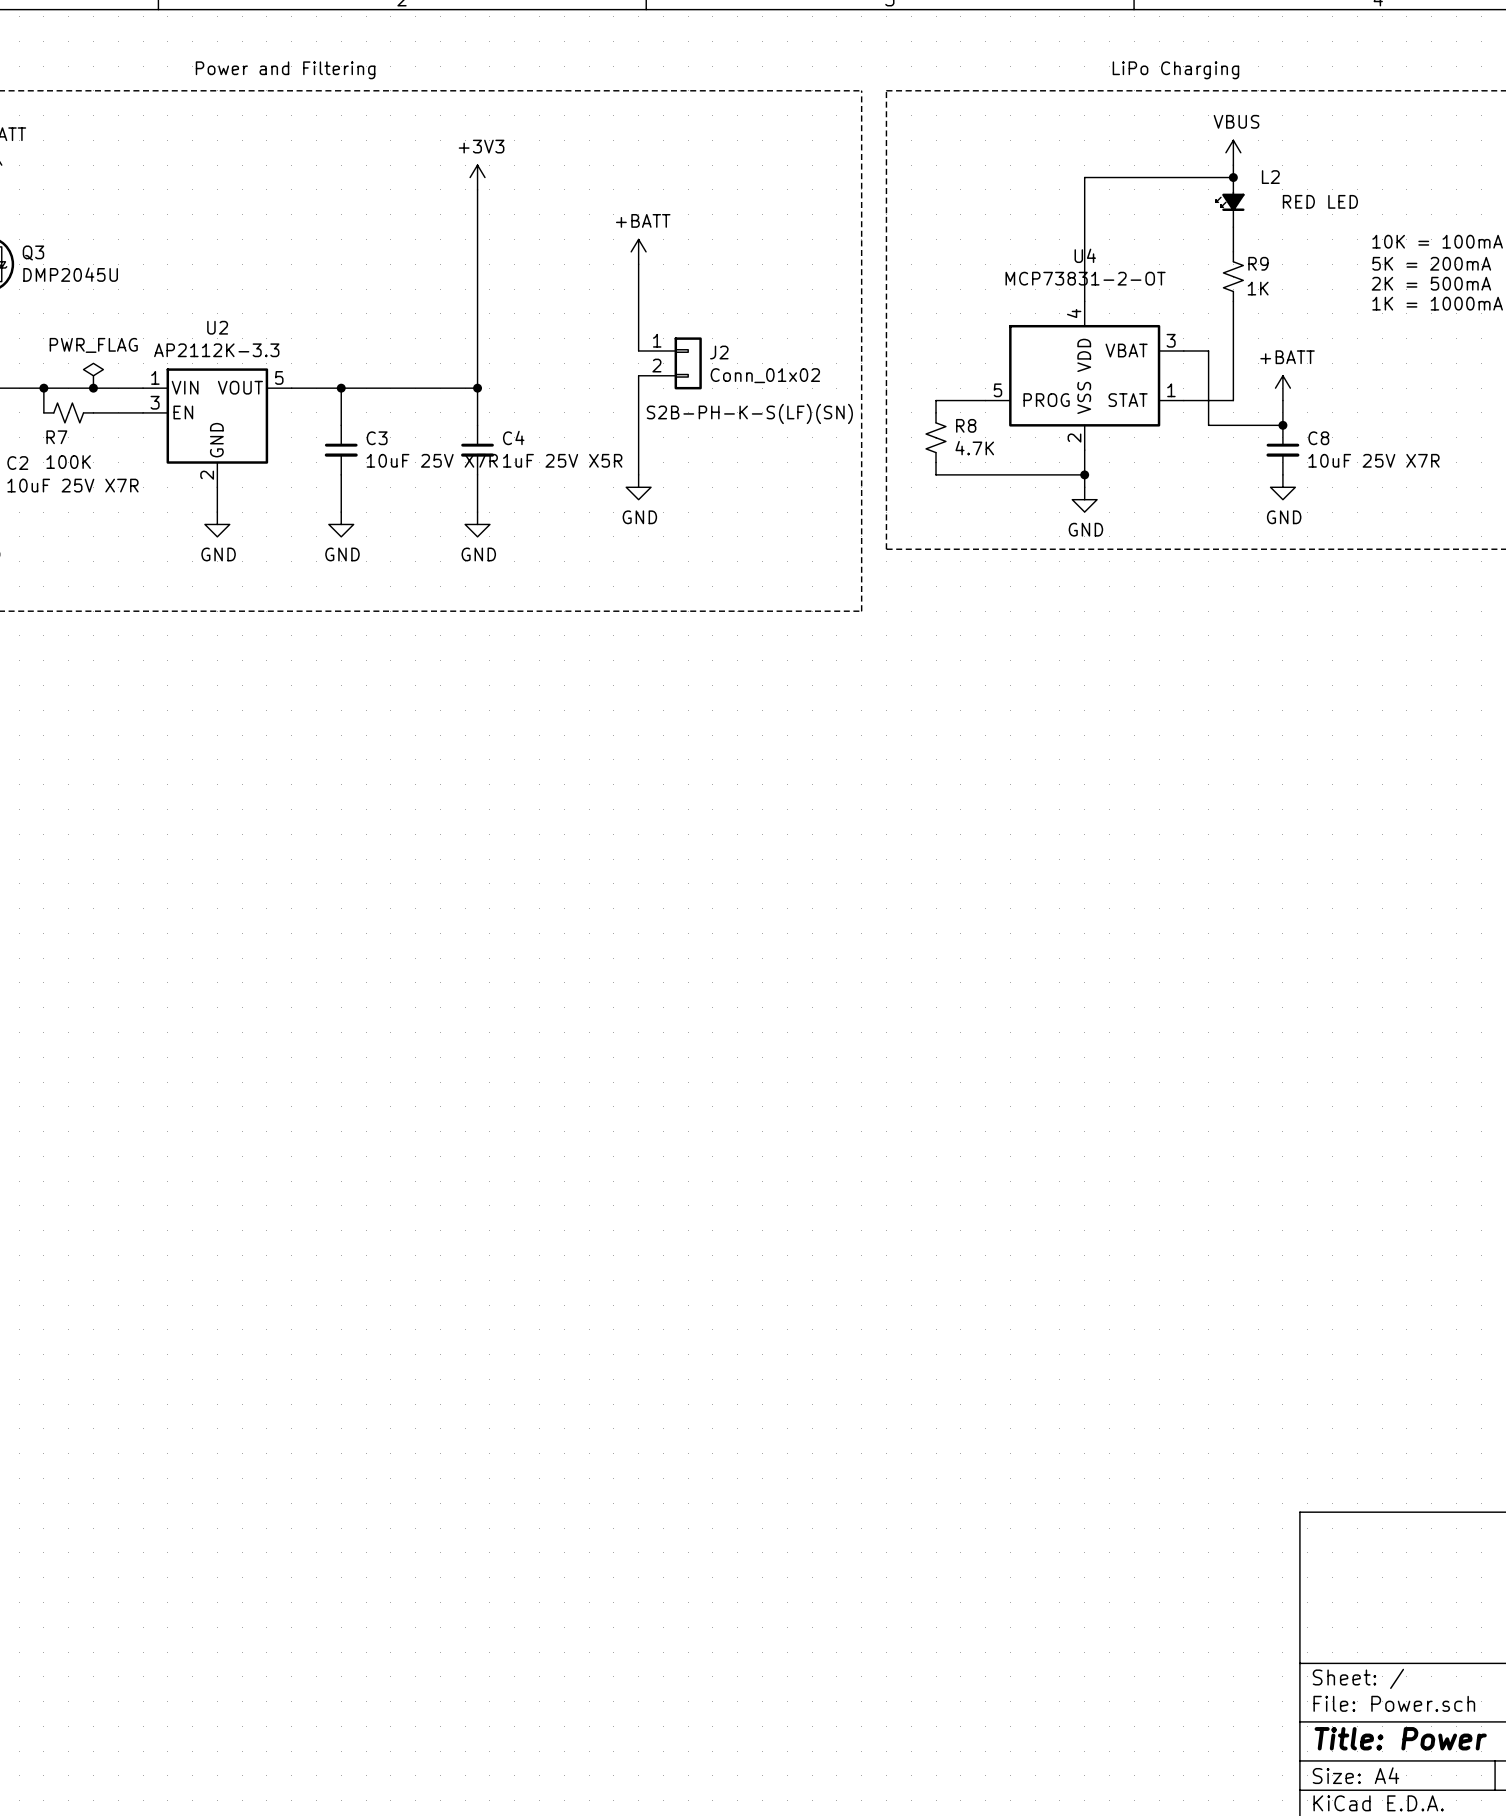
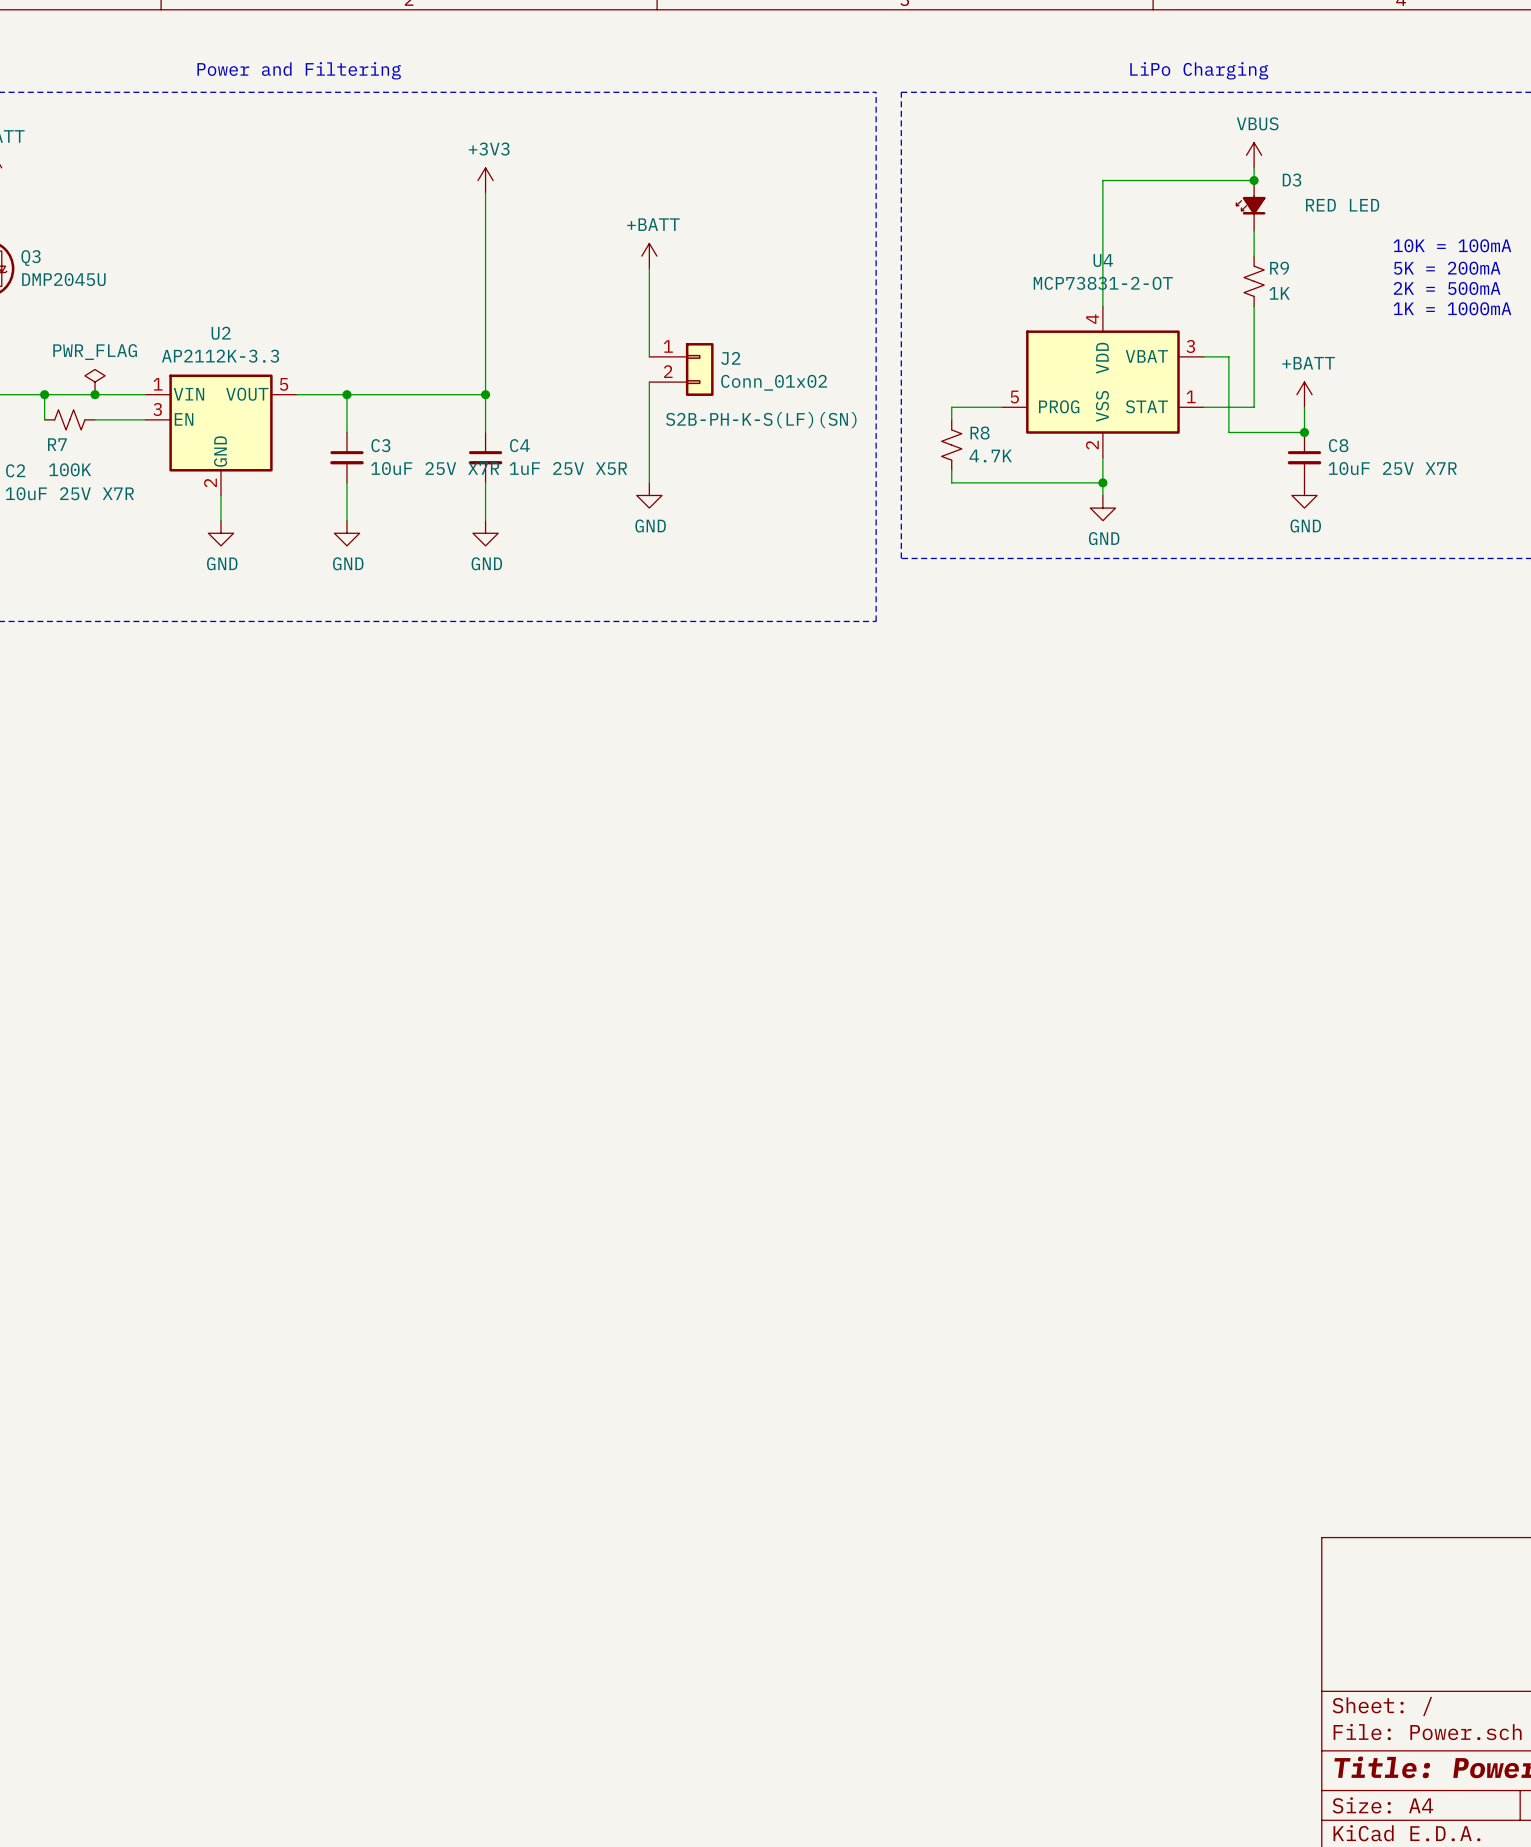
L2 name: L2 (1270, 177) -> D3 (1292, 180)

